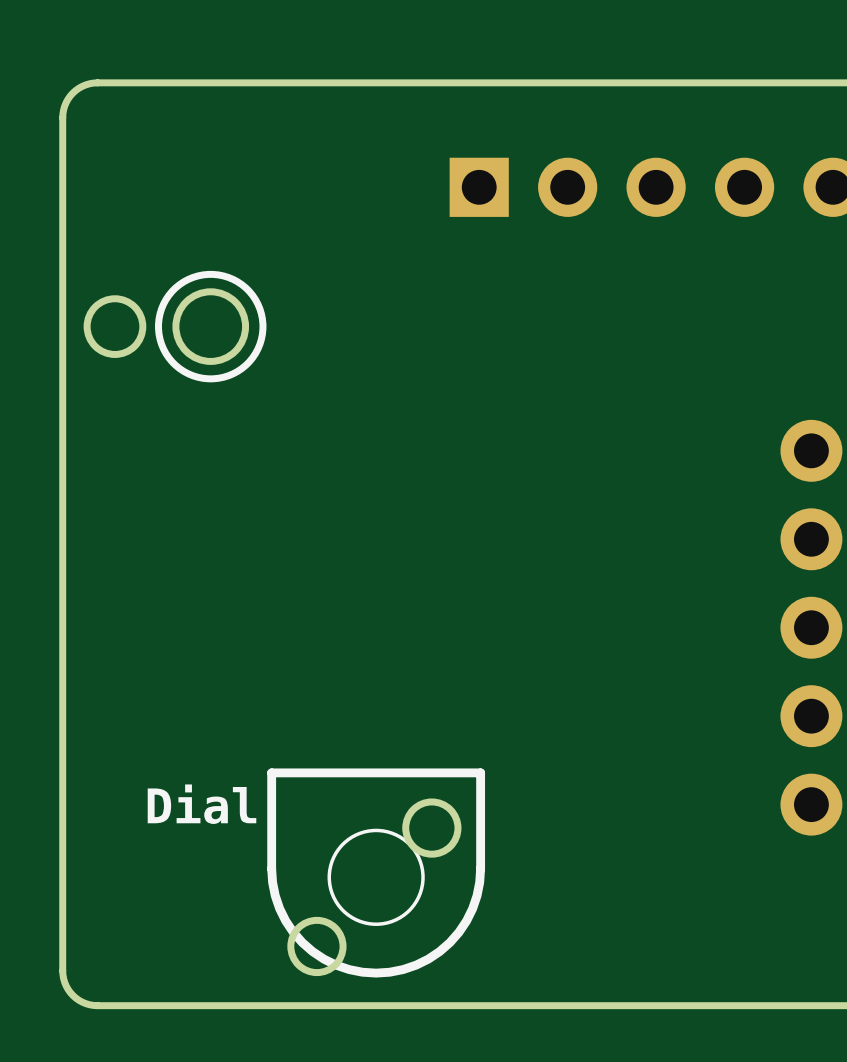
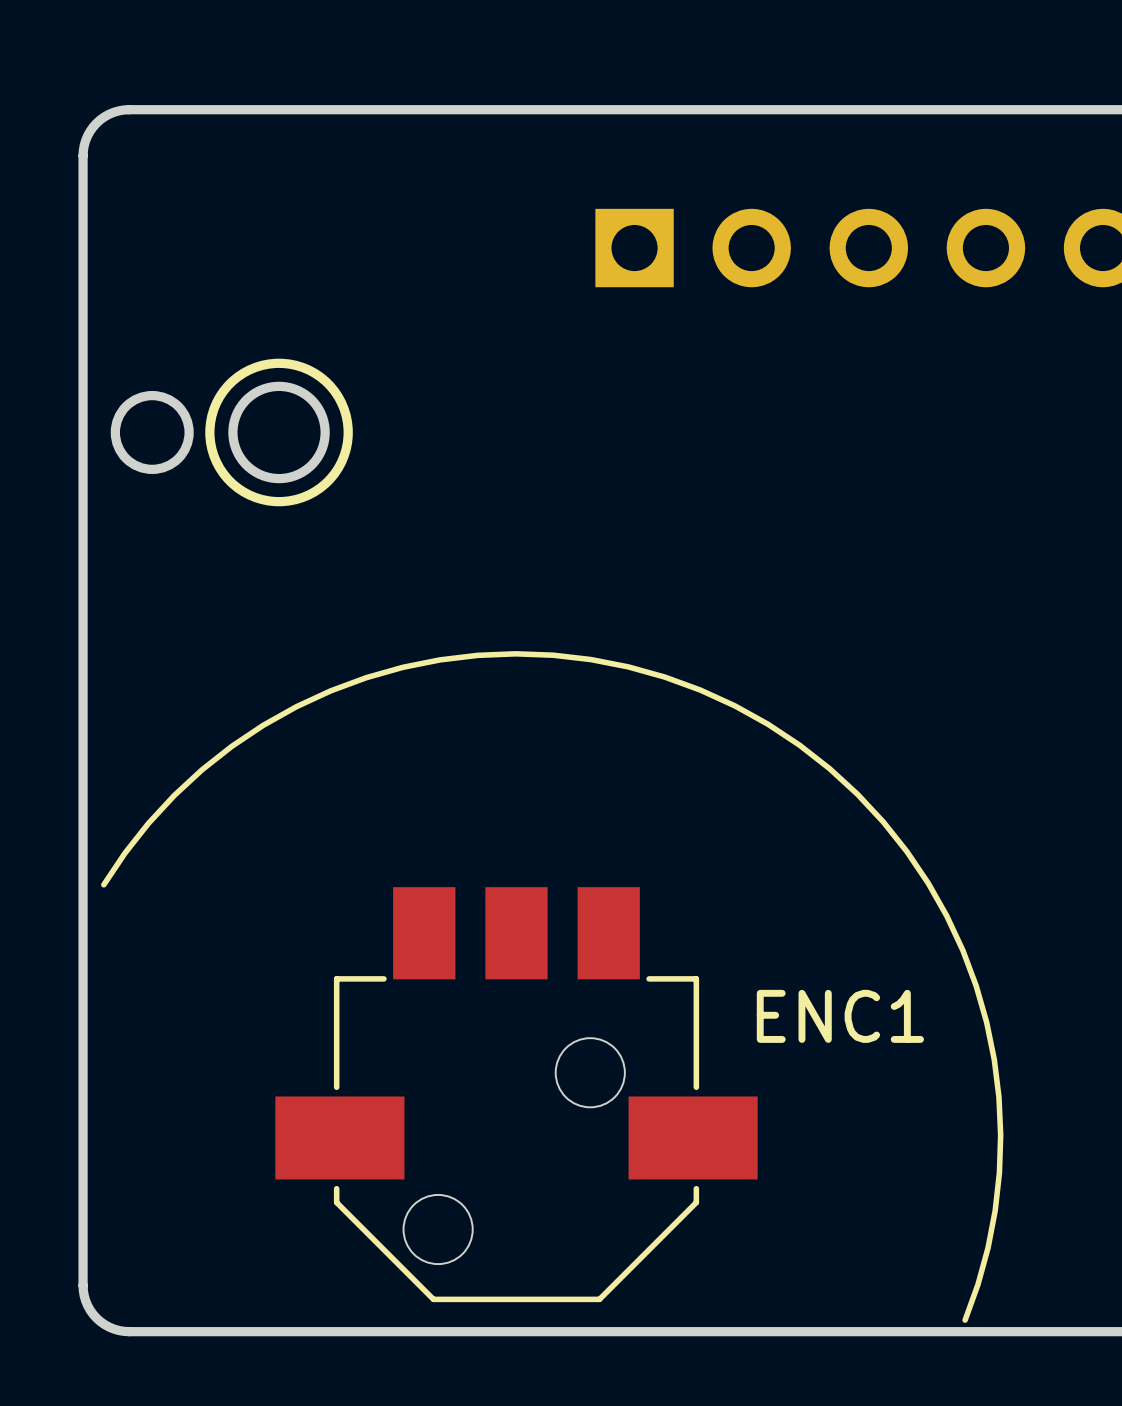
part: (811, 627) -> none
ENC1: none -> (552, 986)
round board edge: [402, 798, 462, 858] -> none
text: Dial (202, 804) -> none
drawing: [327, 828, 425, 926] -> none
line: (271, 868) (272, 882) (279, 908) (293, 932) (302, 942) (312, 951) (336, 965) (349, 969) (376, 973) (403, 969) (416, 965) (439, 951) (450, 942) (466, 920) (472, 908) (479, 882) (480, 868) -> none
line: (271, 868) (271, 772) (480, 772) (480, 868) -> none
round board edge: [287, 916, 347, 977] -> none

